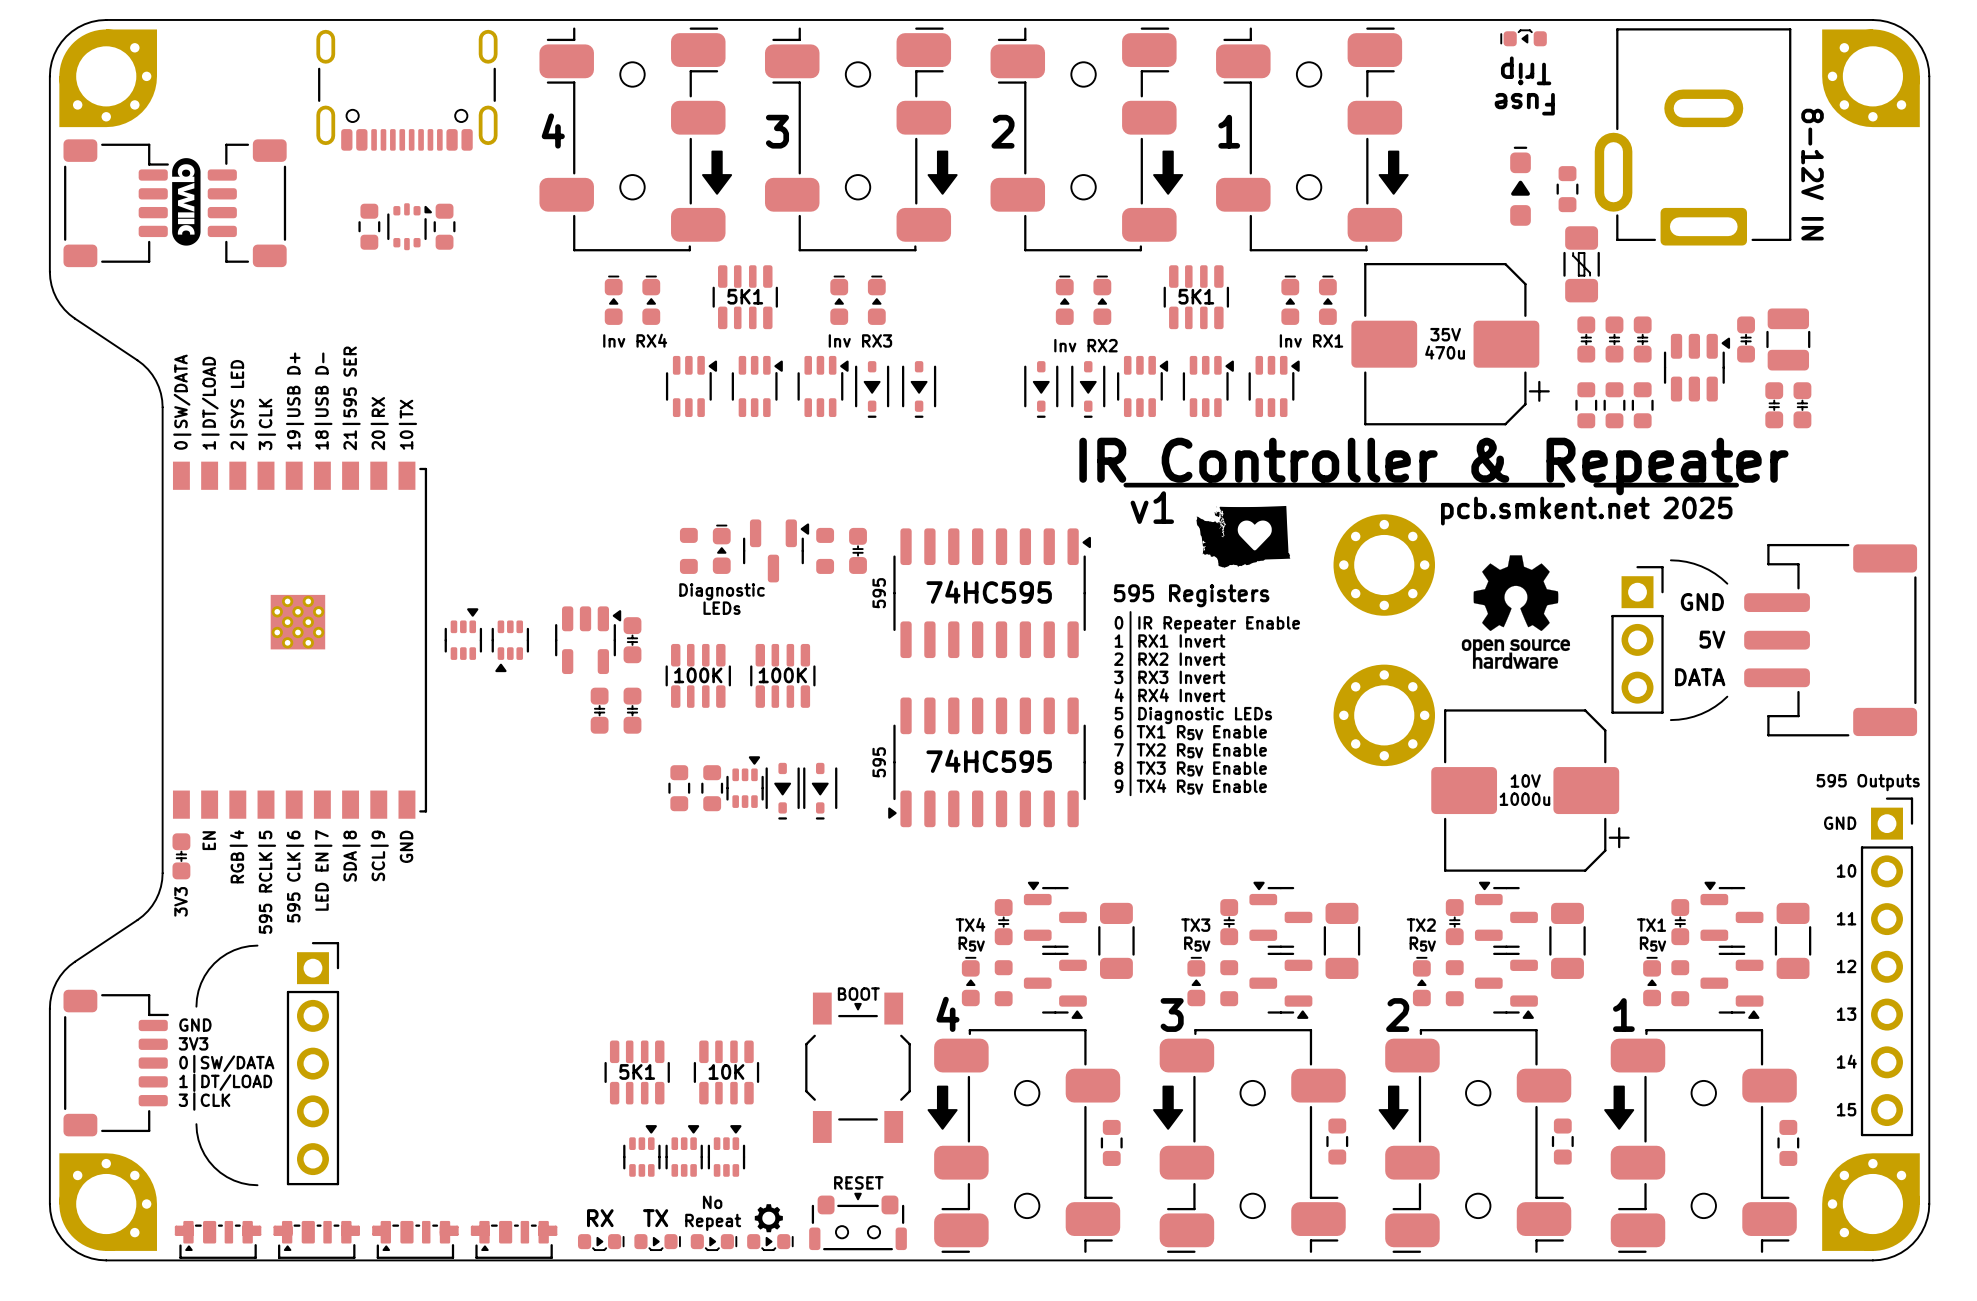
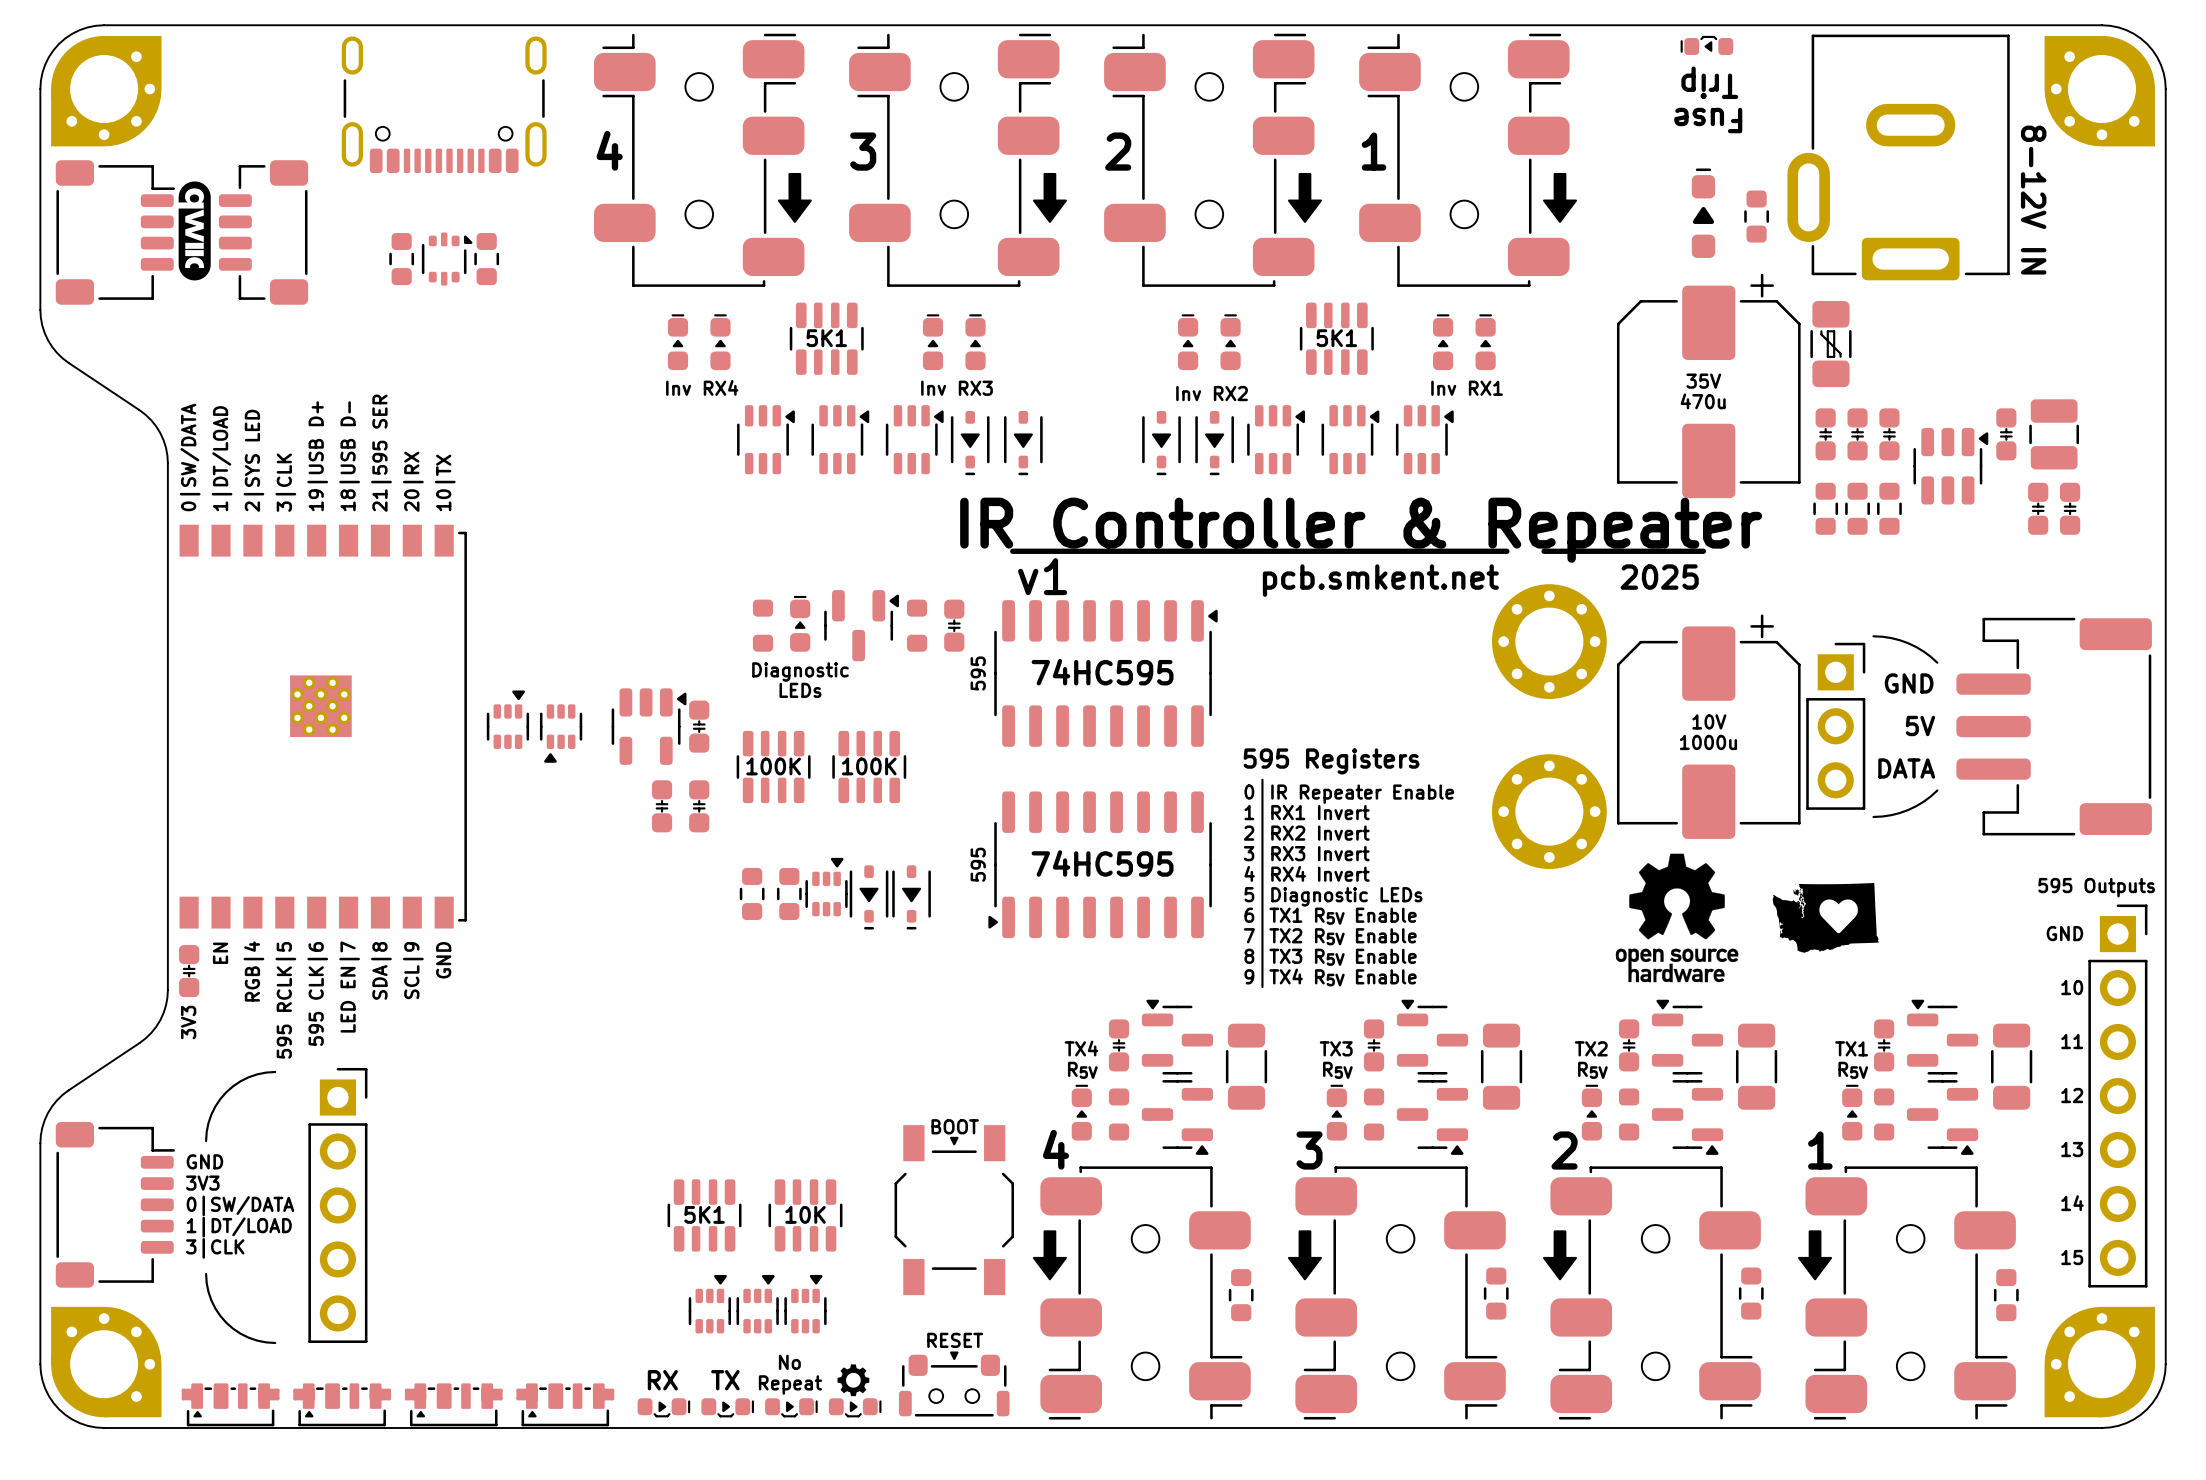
part position: (1581, 264) -> (1830, 344)
part footprint: [1663, 333, 1731, 402] -> [1879, 408, 1900, 461]
text position: 35V (1445, 334) -> 35V (1703, 381)
part: (1586, 339) -> none
part: (1614, 339) -> none
part: (1642, 339) -> none
part: (1746, 339) -> none
part position: (1788, 339) -> (2054, 434)
part rotation: 0° (1450, 344) -> 90° counterclockwise (1708, 385)
text position: 470u (1445, 352) -> 470u (1703, 401)
part: none -> (1825, 434)
part: none -> (1857, 434)
part: none -> (2006, 434)
part: (1586, 405) -> none
part: (1614, 405) -> none
part: (1642, 405) -> none
part: (1774, 405) -> none
part: (1802, 405) -> none
part: none -> (1950, 466)
part: none -> (1825, 508)
part: none -> (1857, 508)
part: none -> (1889, 508)
part: none -> (2038, 508)
part: none -> (2070, 508)
text position: IR Controller & Repeater (1433, 466) -> IR Controller & Repeater (1361, 530)
line: none -> (1012, 551) (1257, 551)
line: (1346, 485) (1379, 485) -> none
line: (1520, 485) (1562, 485) -> none
line: (1595, 485) (1736, 485) -> none
drawing: [1196, 505, 1291, 568] -> none
text position: v1 (1152, 507) -> v1 (1042, 576)
text position: 2025 (1697, 507) -> 2025 (1659, 577)
text position: pcb.smkent.net (1545, 511) -> pcb.smkent.net (1380, 580)
text position: 595 Registers (1191, 595) -> 595 Registers (1331, 761)
line: (1130, 612) (1130, 687) -> (1262, 901) (1262, 986)
drawing position: (1515, 612) -> (1677, 917)
text position: 0 (1118, 622) -> 0 (1249, 792)
text position: IR Repeater Enable (1219, 624) -> IR Repeater Enable (1362, 794)
text position: 1 (1118, 641) -> 1 (1249, 812)
text position: RX1 Invert (1181, 641) -> RX1 Invert (1320, 812)
text position: 2 (1118, 659) -> 2 (1249, 833)
text position: RX2 Invert (1181, 659) -> RX2 Invert (1320, 833)
text position: 3 (1118, 677) -> 3 (1249, 853)
text position: RX3 Invert (1181, 677) -> RX3 Invert (1320, 853)
text position: 4 (1119, 695) -> 4 (1249, 873)
text position: RX4 Invert (1181, 695) -> RX4 Invert (1320, 873)
text position: 5 (1118, 713) -> 5 (1249, 894)
text position: Diagnostic LEDs (1205, 715) -> Diagnostic LEDs (1346, 896)
text position: 6 (1118, 731) -> 6 (1249, 915)
text position: TX1 R5V Enable (1201, 732) -> TX1 R5V Enable (1343, 916)
text position: 7 (1118, 749) -> 7 (1249, 935)
text position: TX2 R5V Enable (1201, 750) -> TX2 R5V Enable (1343, 936)
text position: 8 (1118, 768) -> 8 (1249, 956)
text position: TX3 R5V Enable (1201, 768) -> TX3 R5V Enable (1343, 957)
drawing: none -> [1772, 883, 1879, 953]
text position: 10V (1525, 781) -> 10V (1709, 721)
text position: 9 (1118, 786) -> 9 (1249, 976)
text position: TX4 R5V Enable (1201, 786) -> TX4 R5V Enable (1343, 977)
part rotation: 0° (1530, 790) -> 90° counterclockwise (1708, 726)
part position: (1530, 790) -> (1708, 726)
text position: 1000u (1524, 799) -> 1000u (1708, 742)

